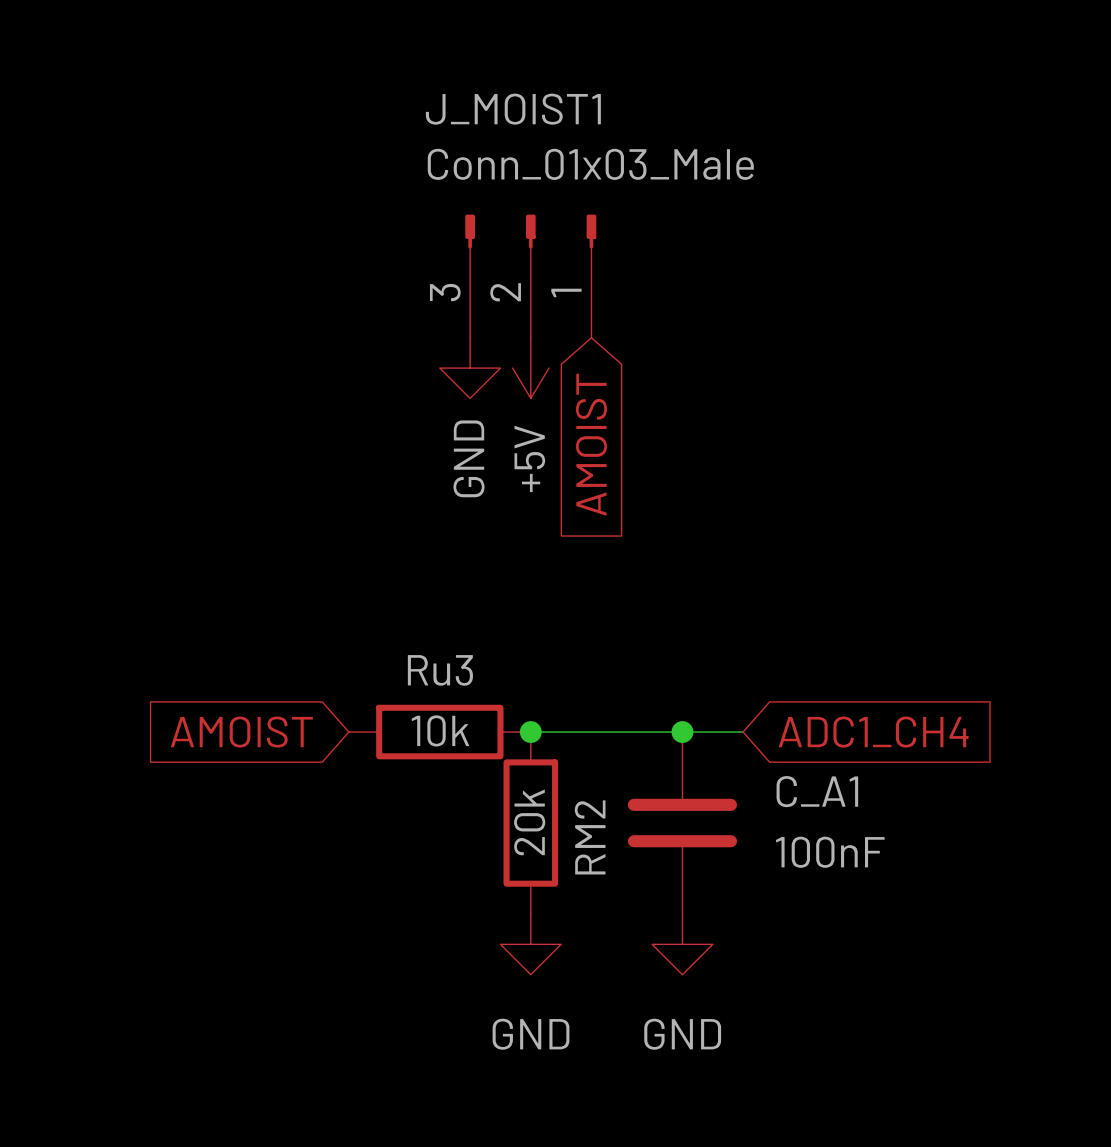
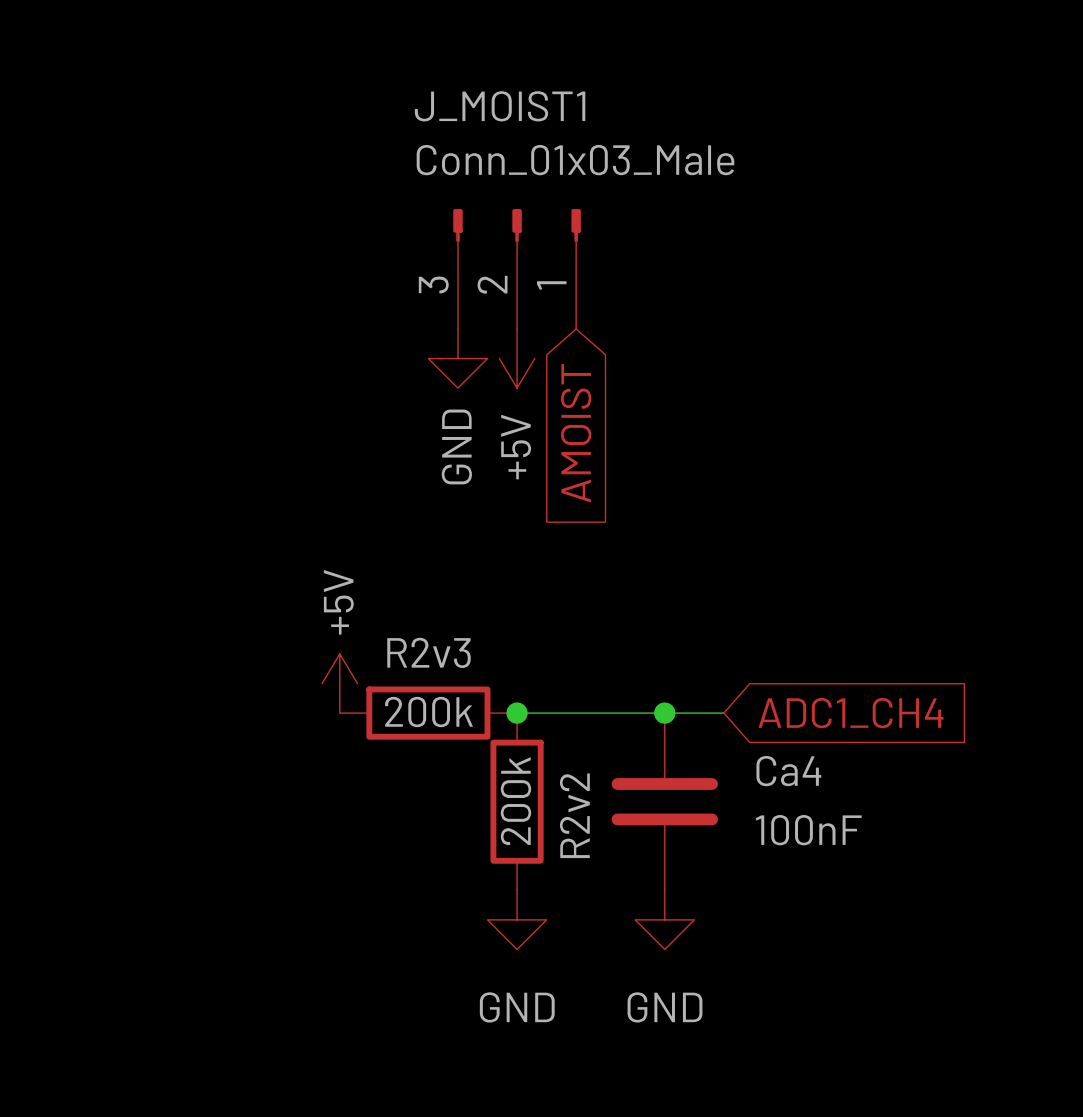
Ru3 name: Ru3 (440, 670) -> R2v3 (429, 652)
power symbol: none -> +5V (339, 683)
Ru3 value: 10k (440, 730) -> 200k (428, 712)
global label: AMOIST (241, 732) -> none
C_A1 name: C_A1 (817, 791) -> Ca4 (788, 771)
RM2 value: 20k (529, 822) -> 200k (515, 801)
RM2 name: RM2 (590, 837) -> R2v2 (574, 815)

